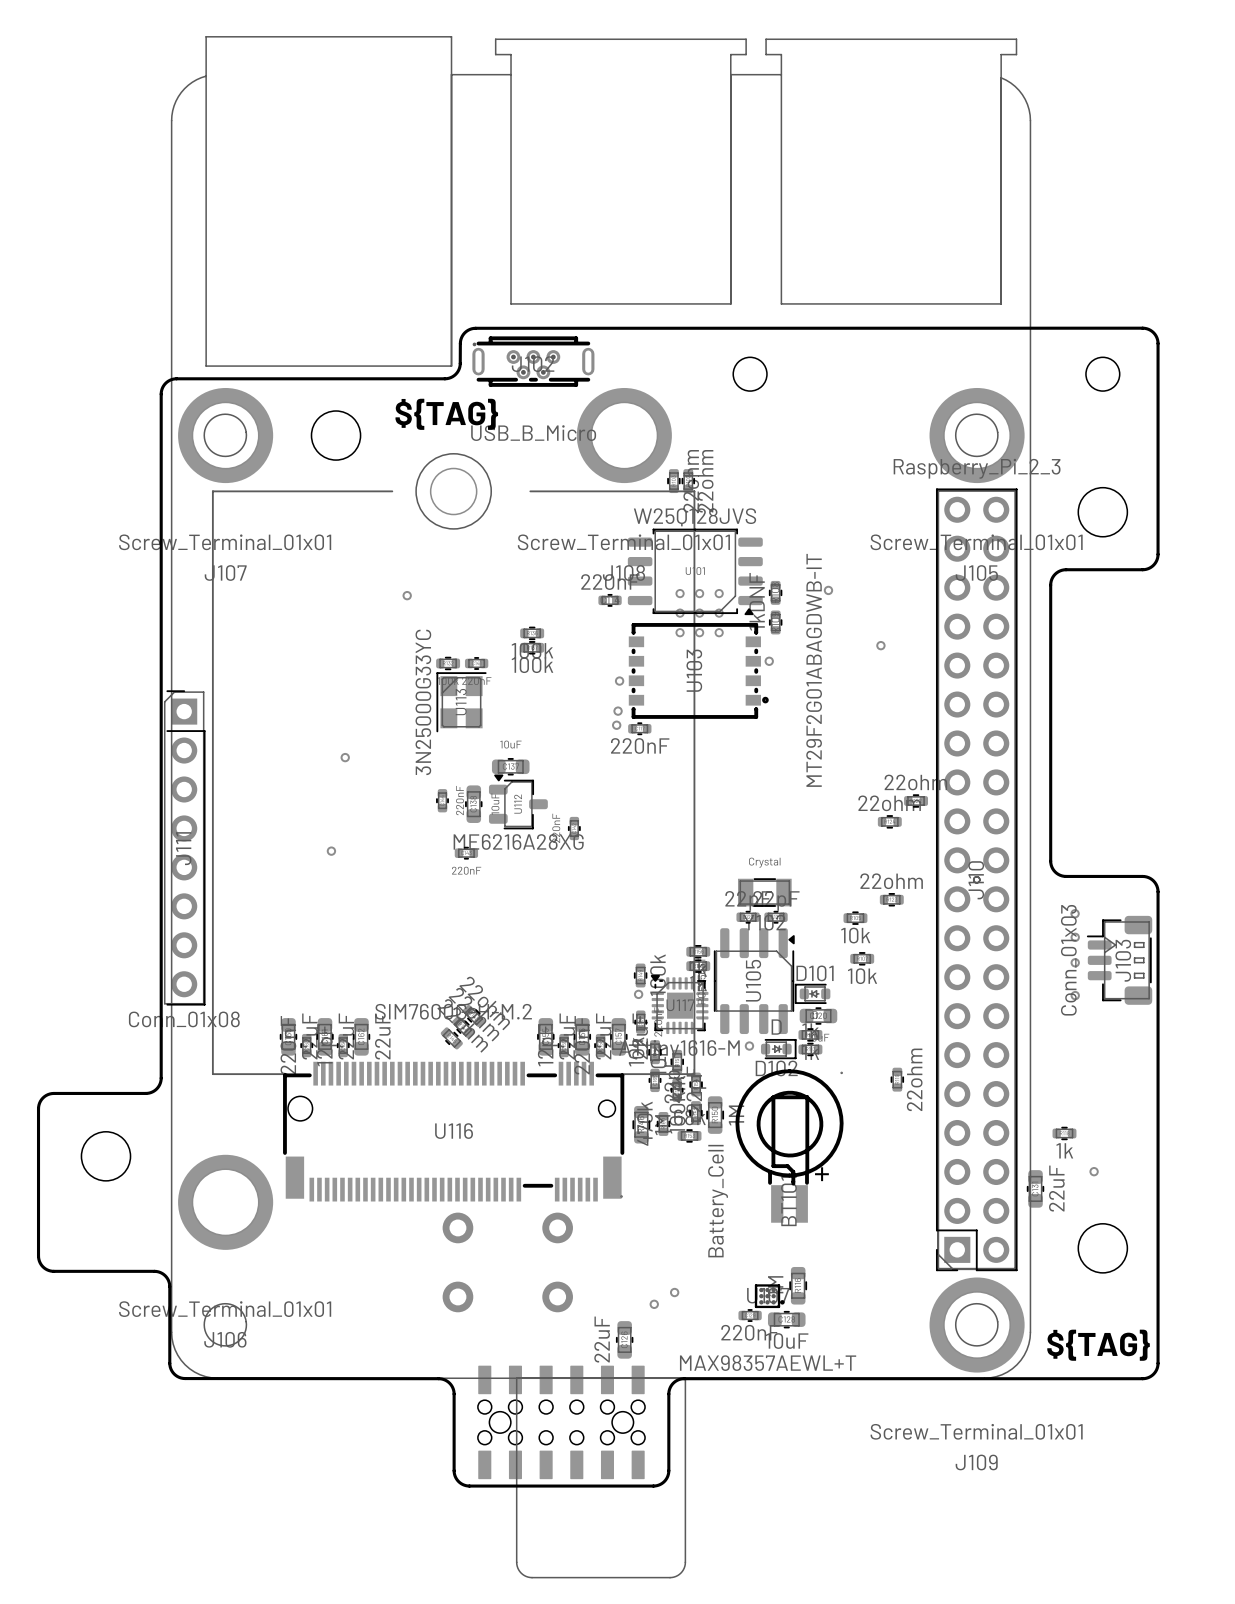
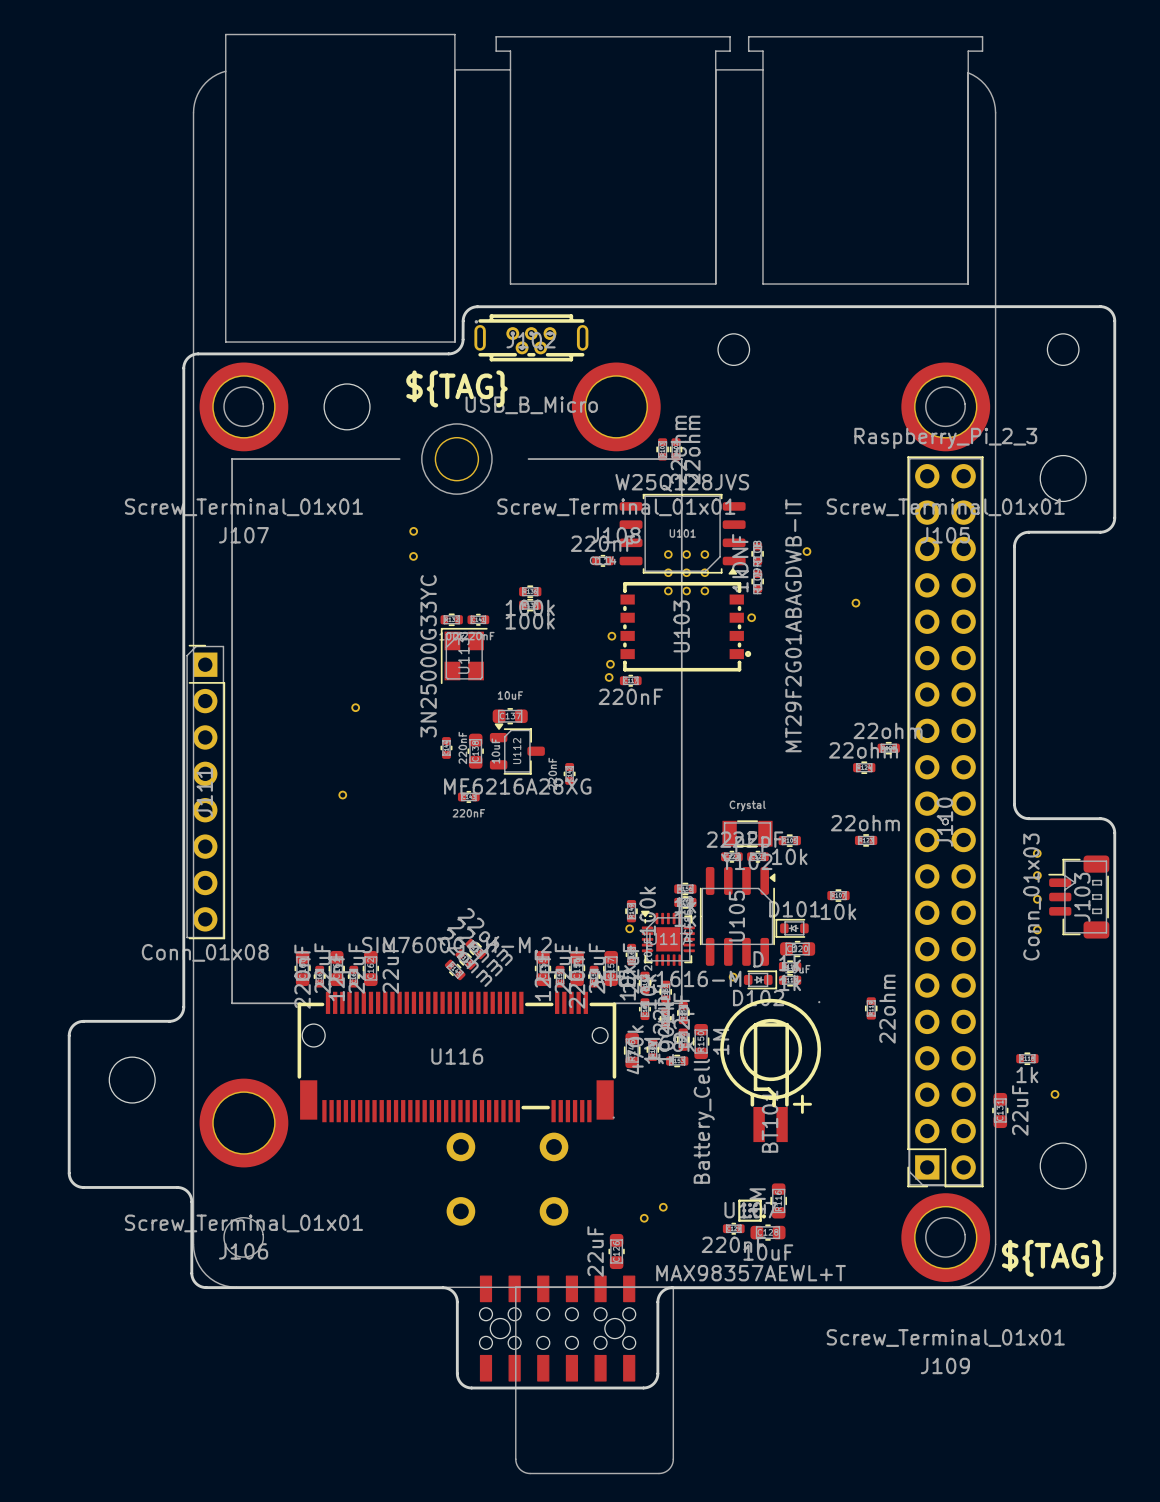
part: none -> (413, 531)
part position: (855, 918) -> (789, 840)

